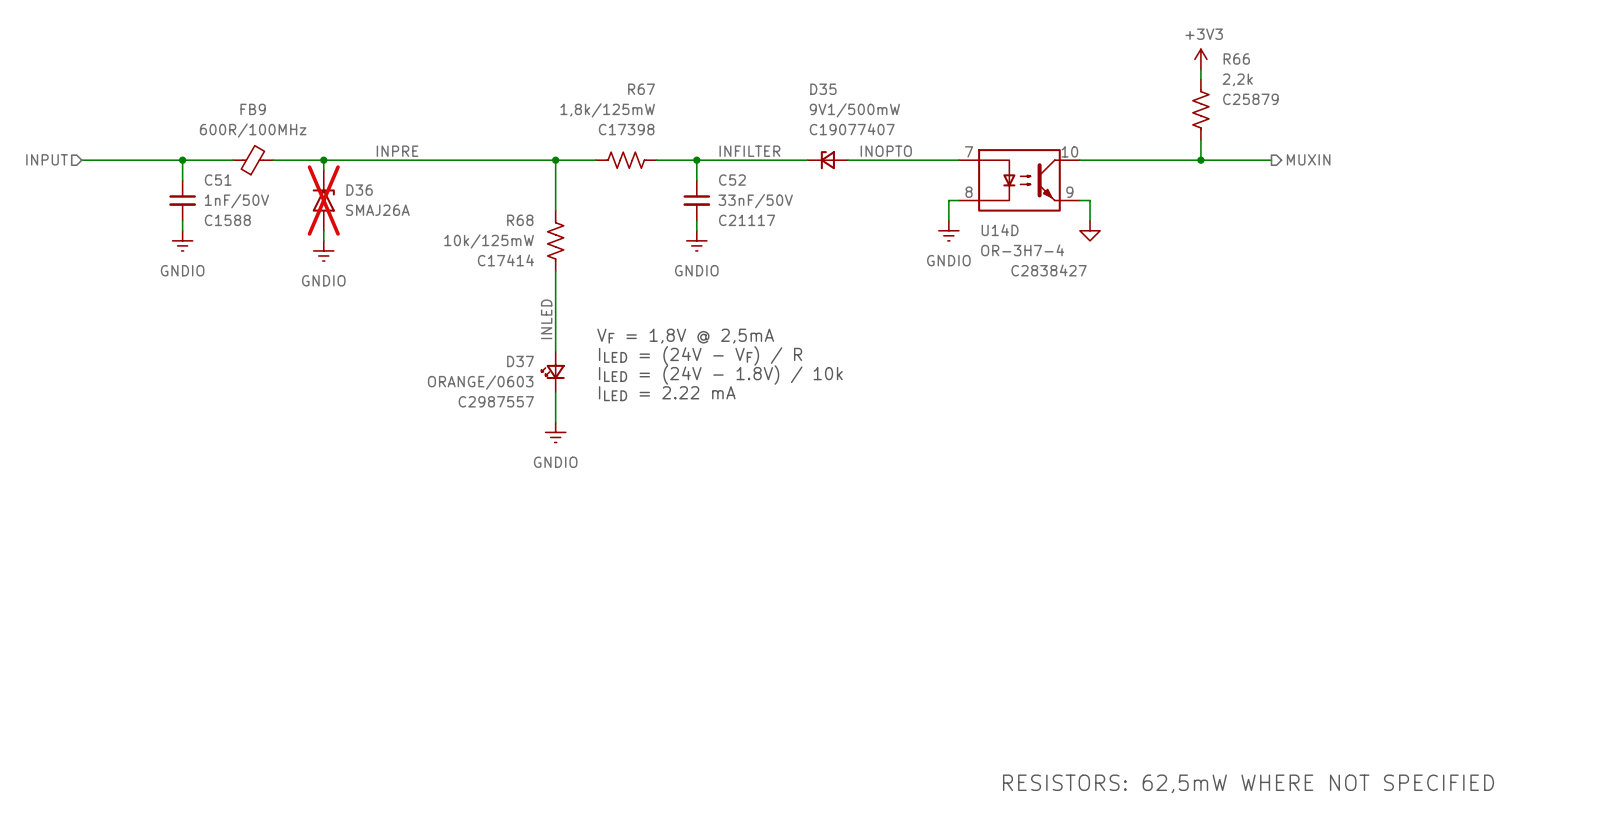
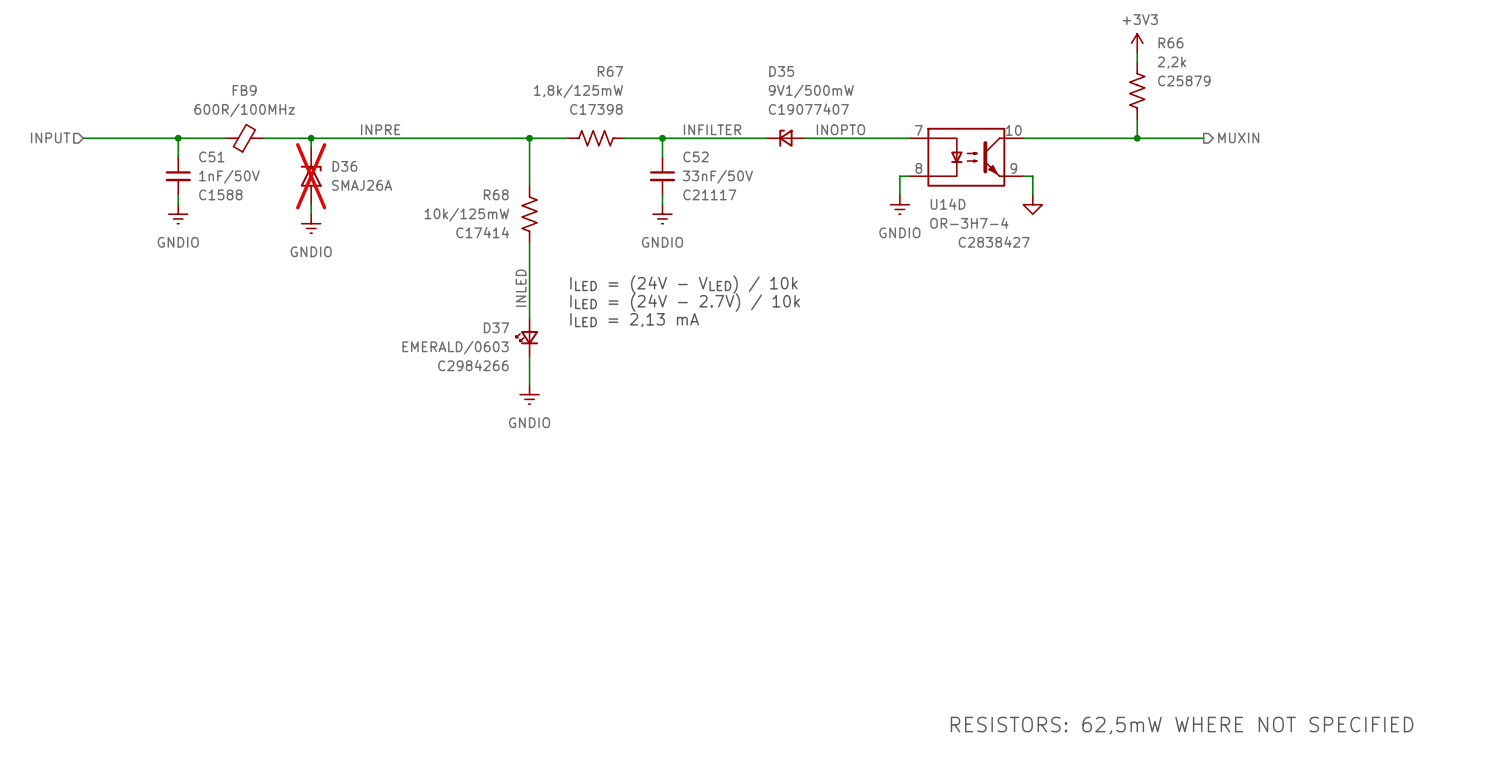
text: none -> ILED = (24V - VLED) / 10k (683, 284)
text: VF = 1,8V @ 2,5mA (685, 336) -> ILED = (24V - 2.7V) / 10k (685, 302)
text: ILED = (24V - VF) / R (700, 355) -> ILED = 2,13 mA (634, 320)
text: ILED = (24V - 1.8V) / 10k (720, 375) -> none
D37 value: ORANGE/0603 (480, 382) -> EMERALD/0603 (455, 347)
text: ILED = 2.22 mA (667, 393) -> none
D37 text: C2987557 (496, 401) -> C2984266 (473, 365)

